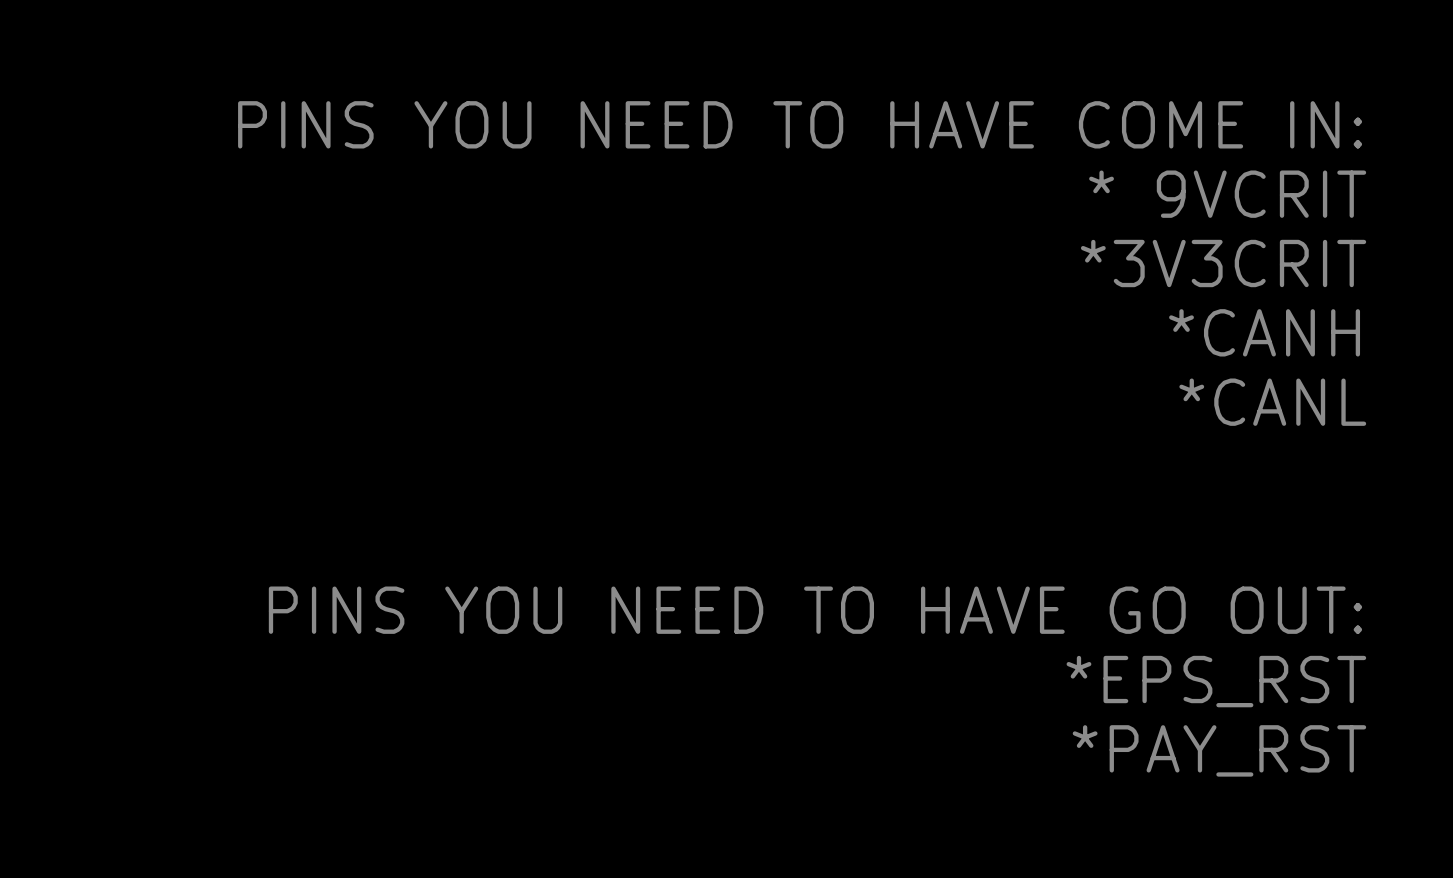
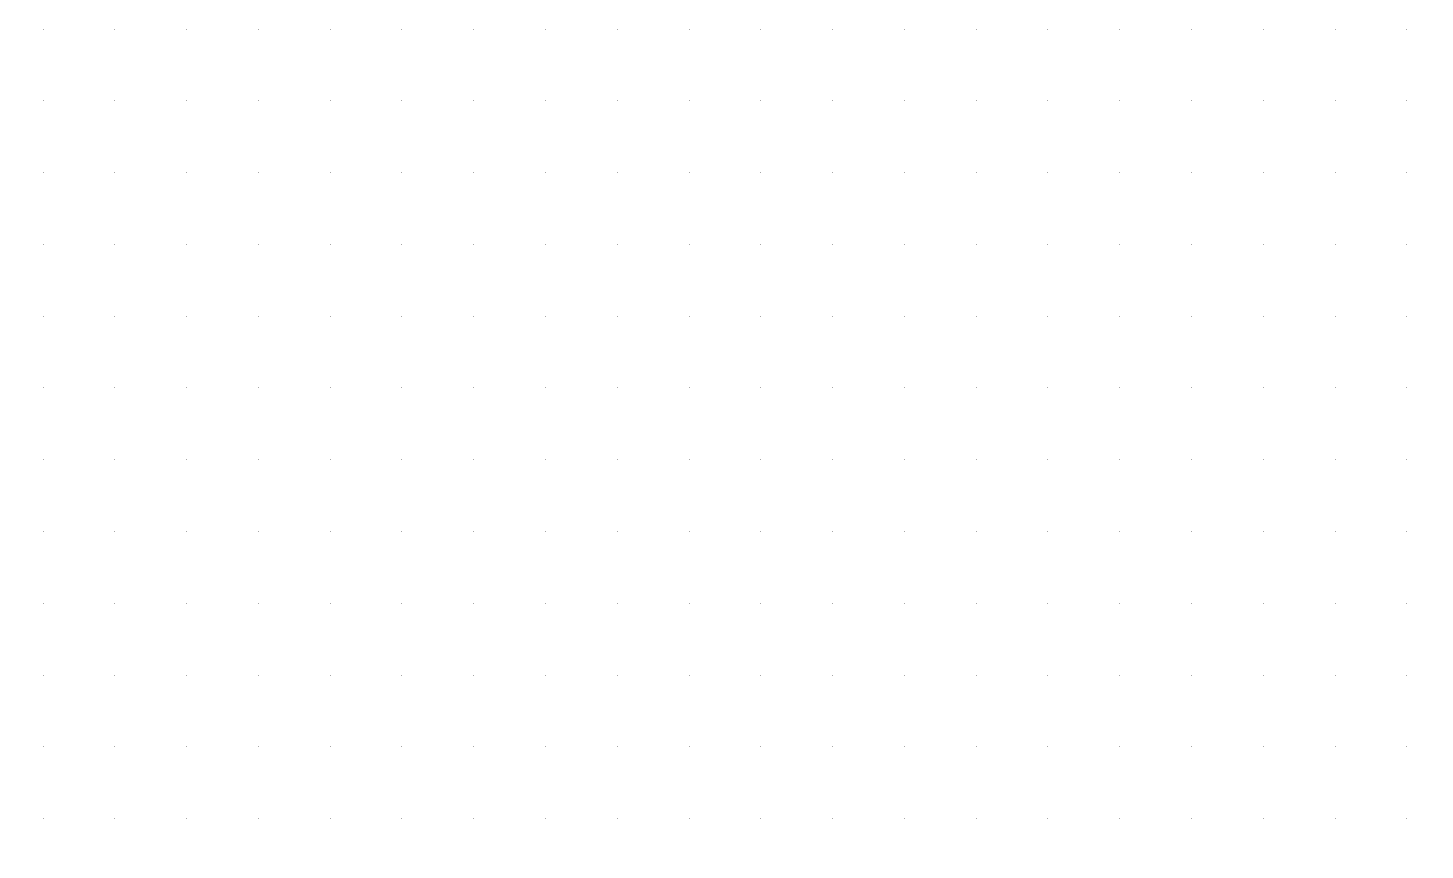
text: PINS YOU NEED TO HAVE COME IN: (800, 124) -> none
text: * 9VCRIT (1227, 194) -> none
text: *3V3CRIT (1223, 263) -> none
text: *CANH (1264, 332) -> none
text: *CANL (1272, 402) -> none
text: PINS YOU NEED TO HAVE GO OUT: (815, 610) -> none
text: *EPS_RST (1216, 681) -> none
text: *PAY_RST (1219, 750) -> none

